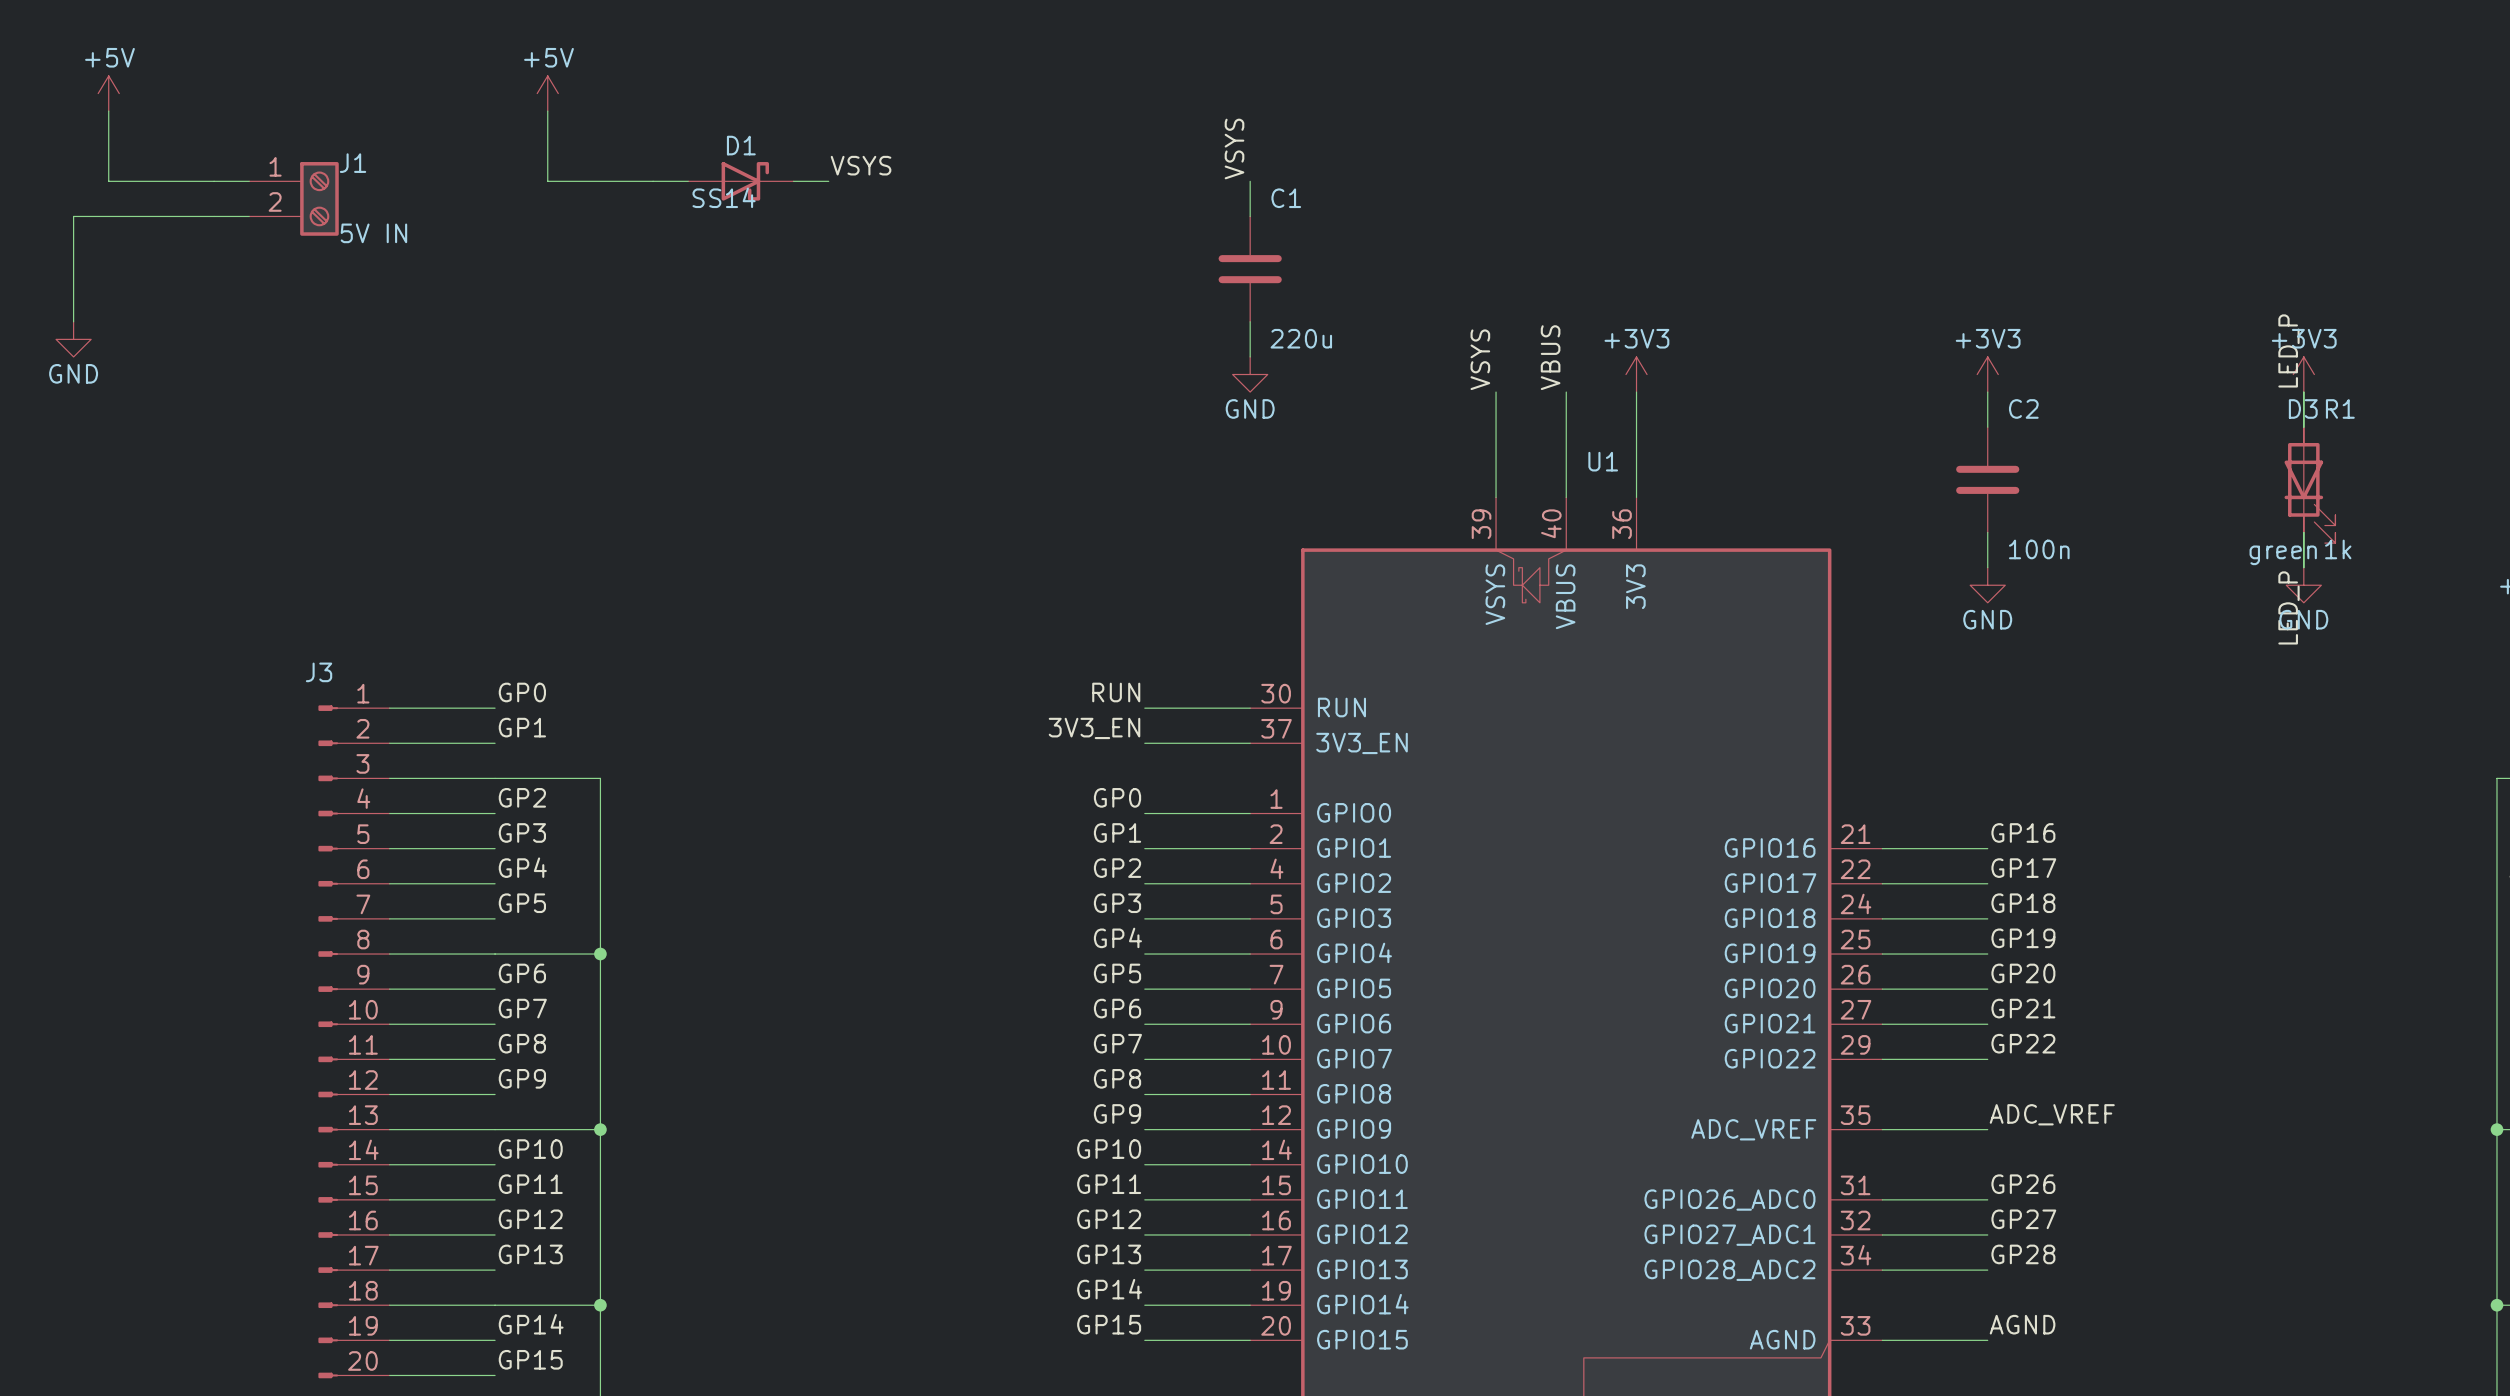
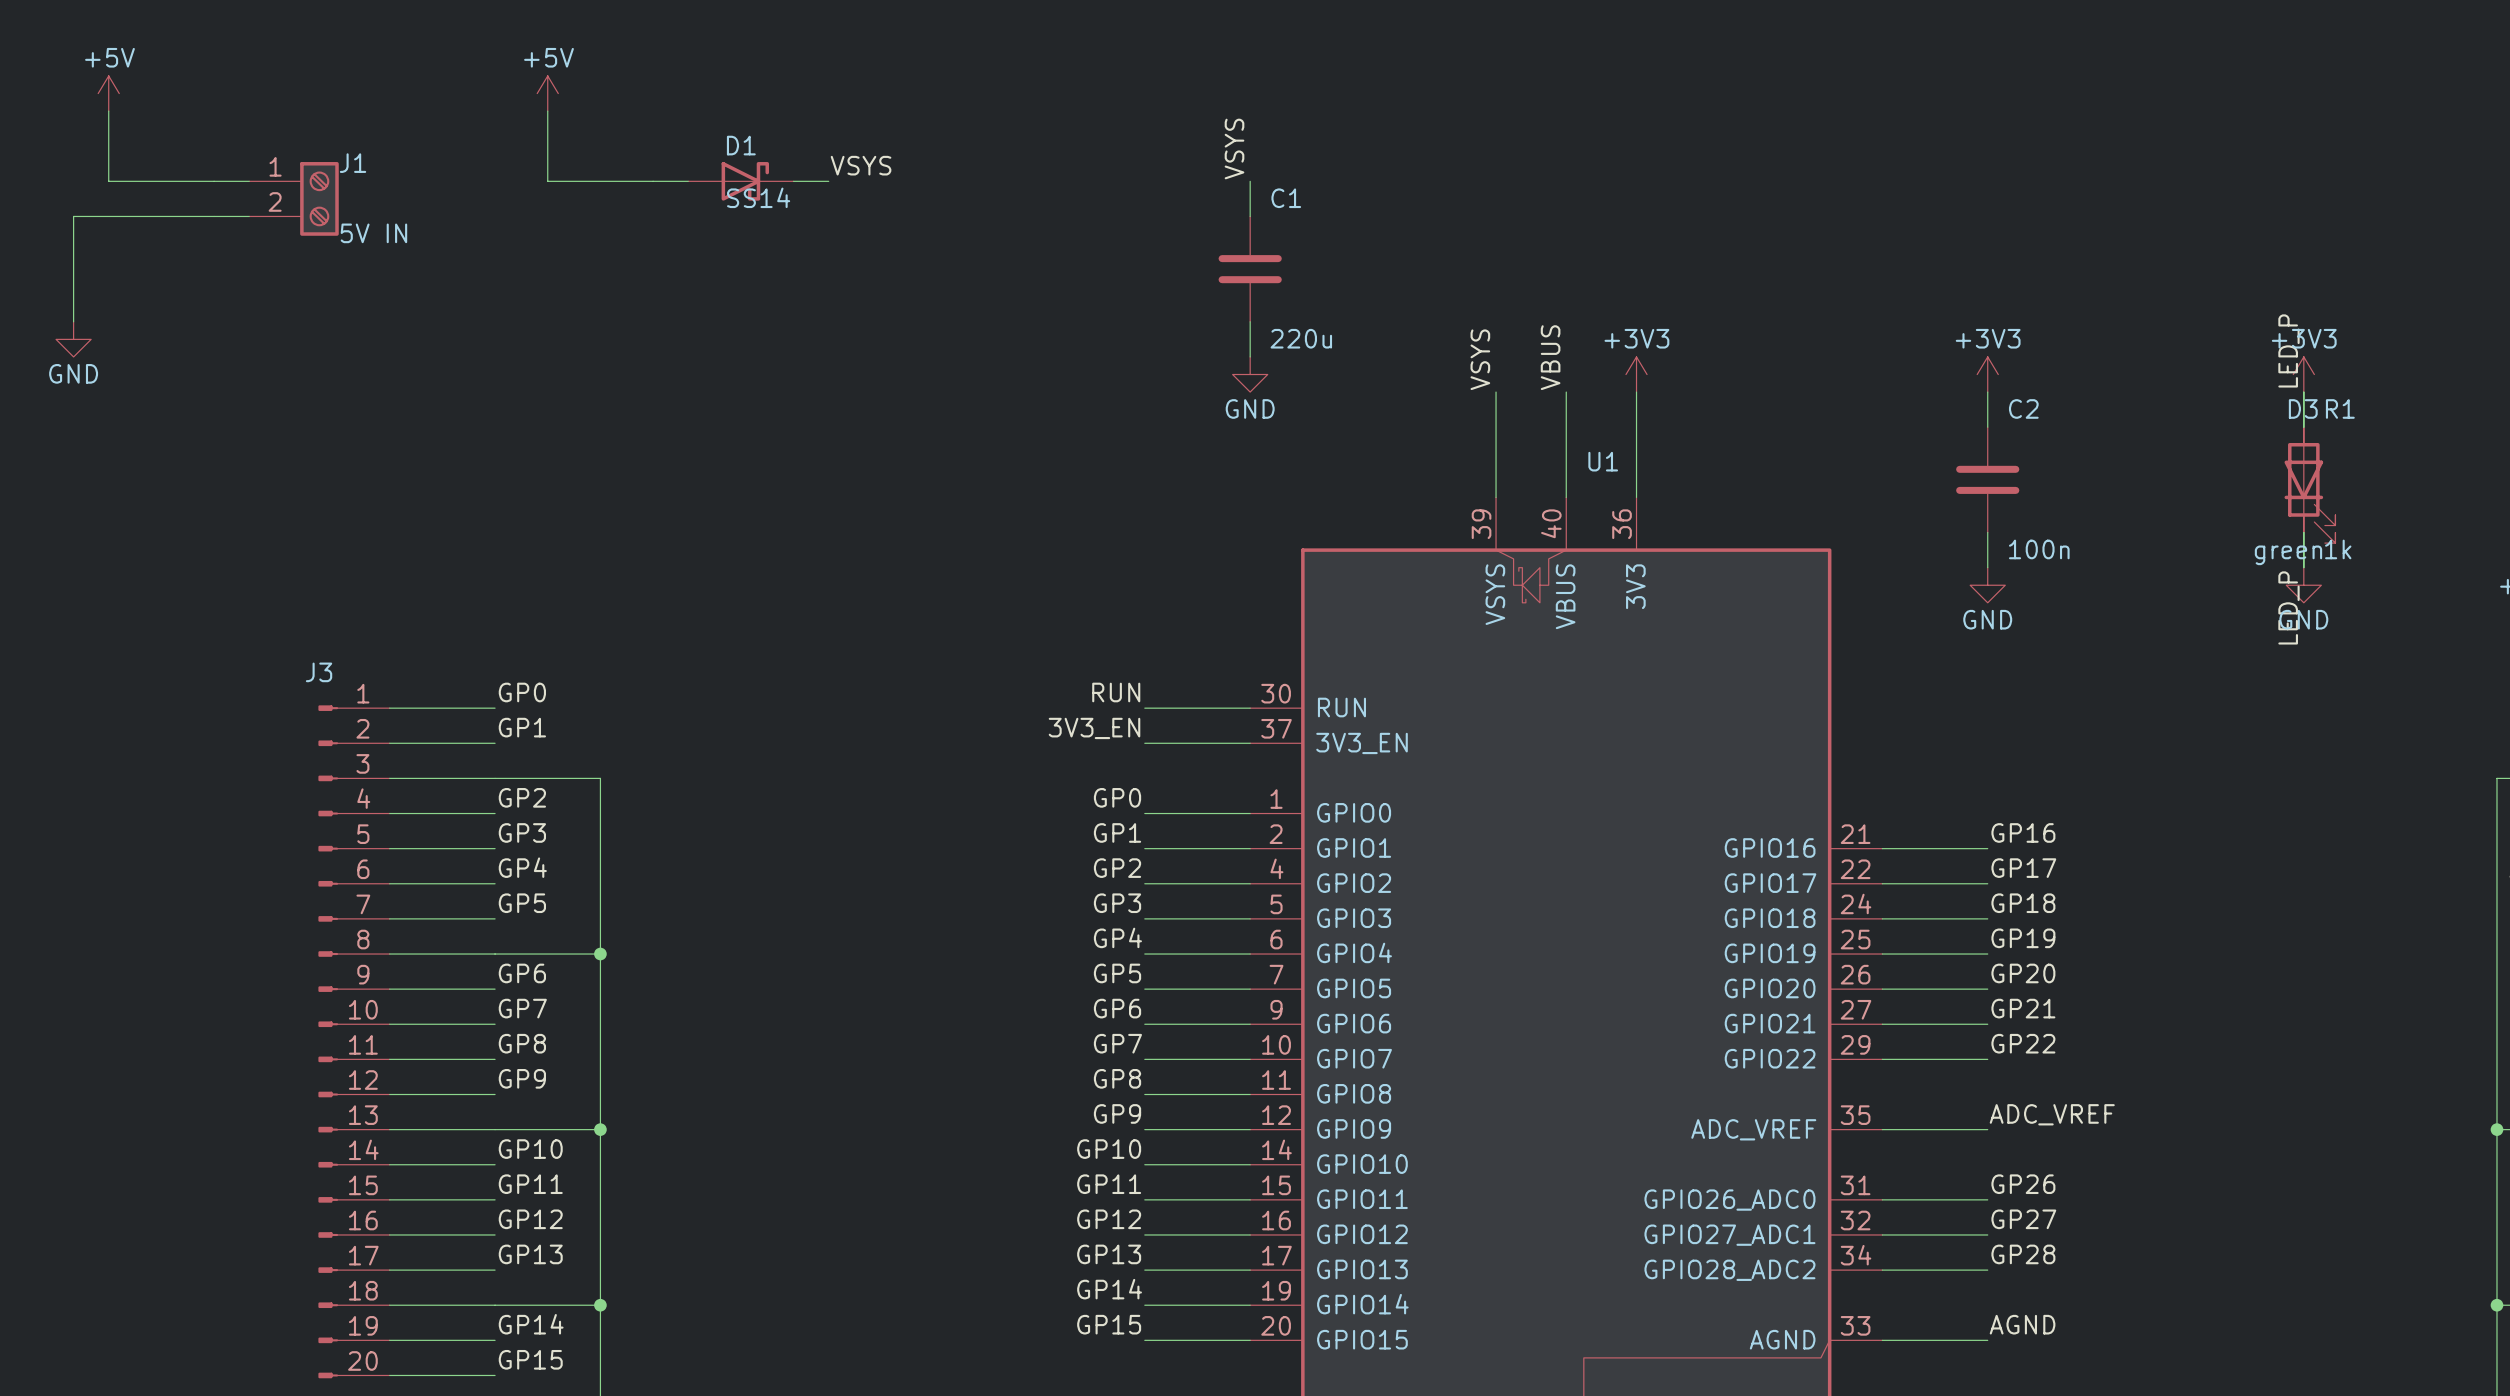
D1 value position: SS14 (724, 197) -> SS14 (758, 197)
D3 value position: green (2283, 555) -> green (2288, 555)

